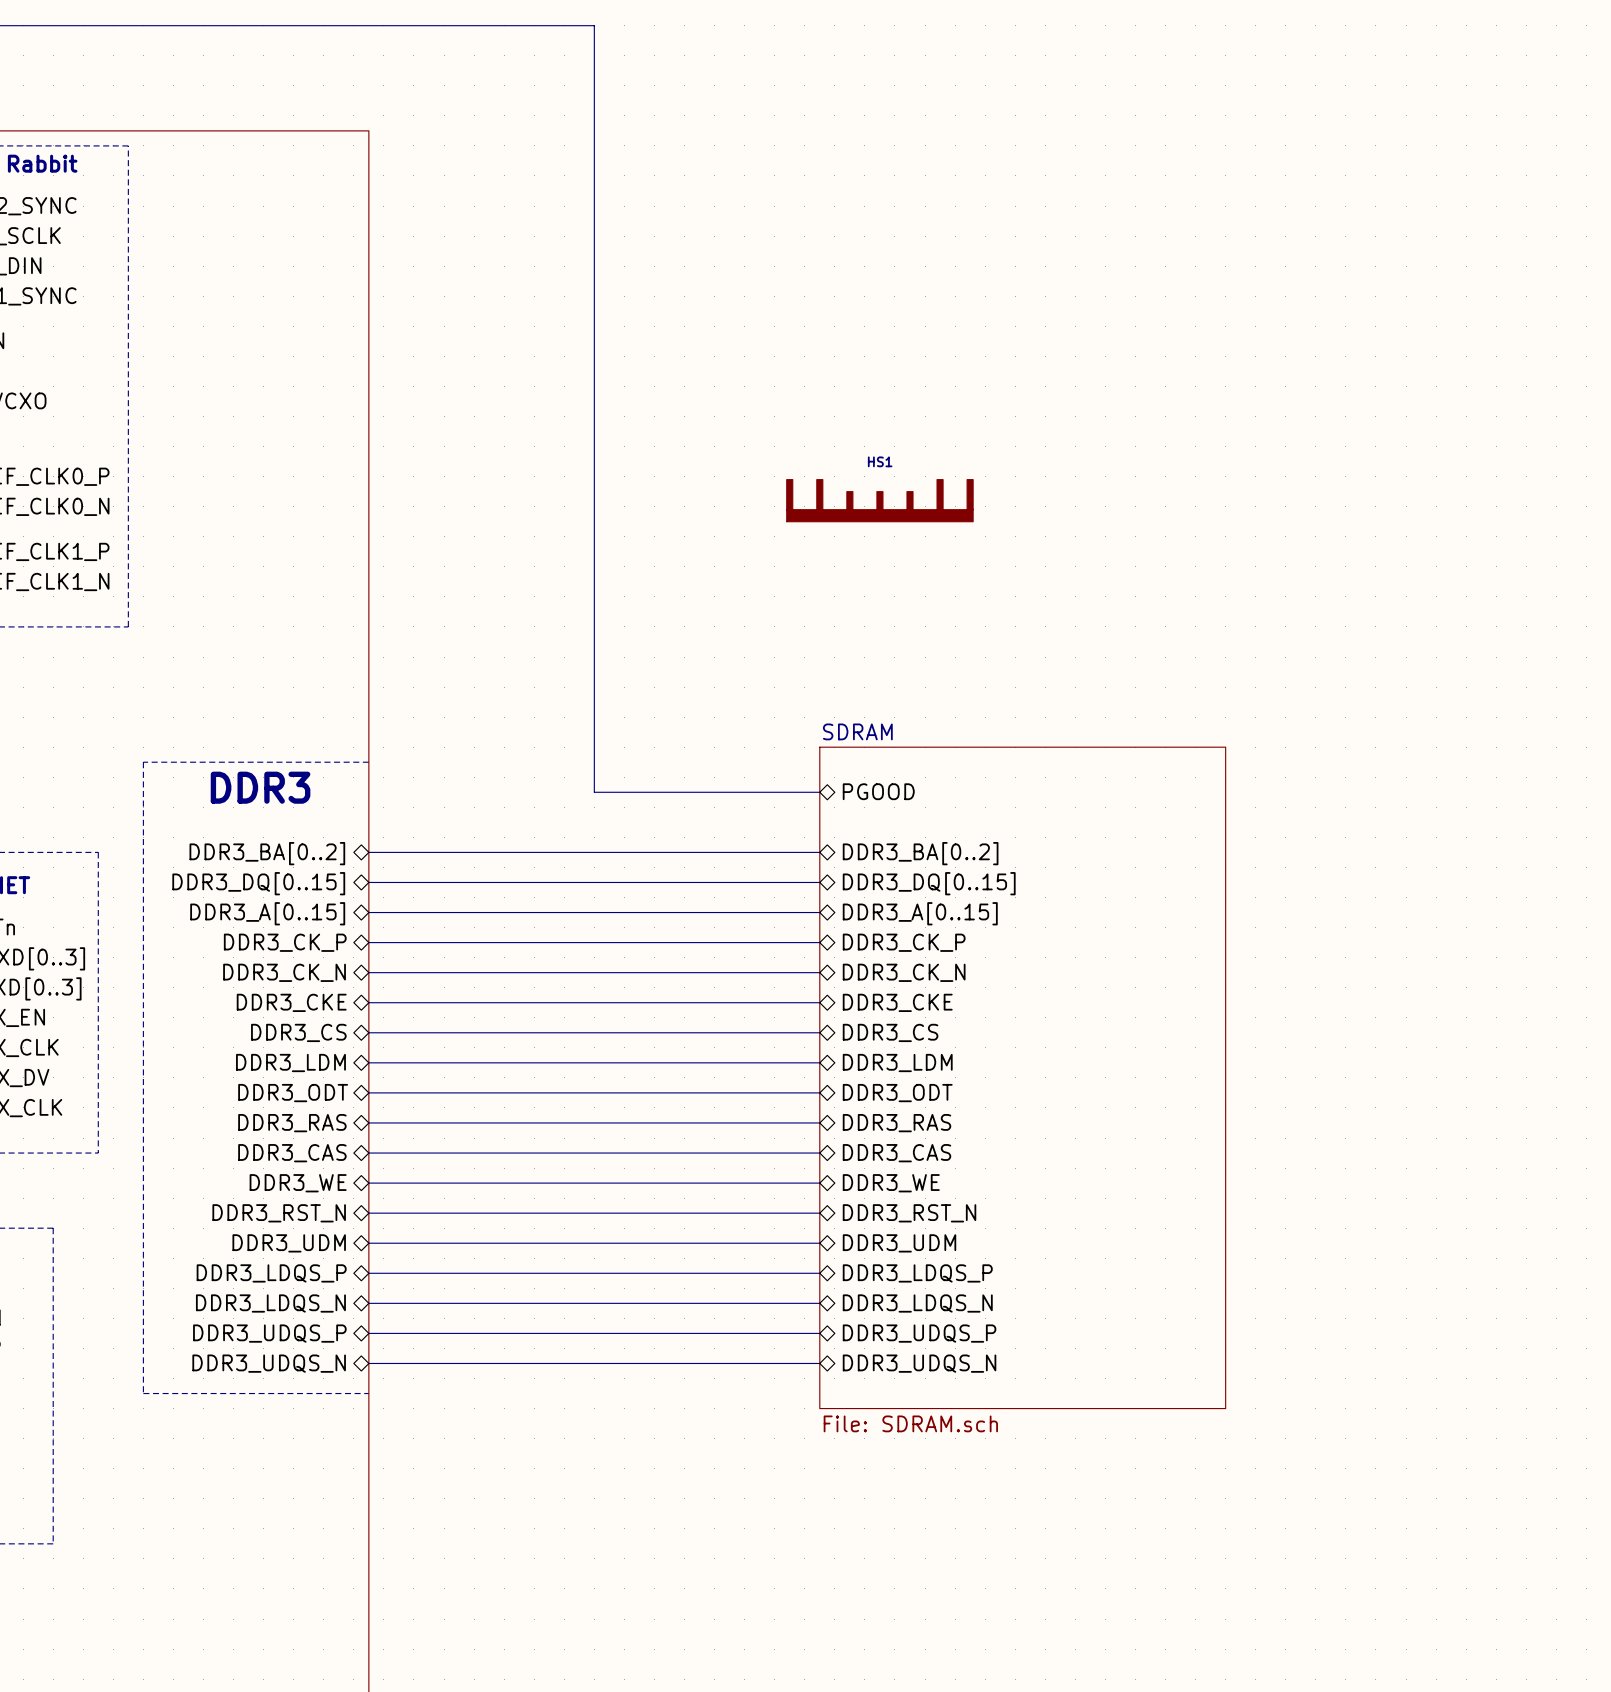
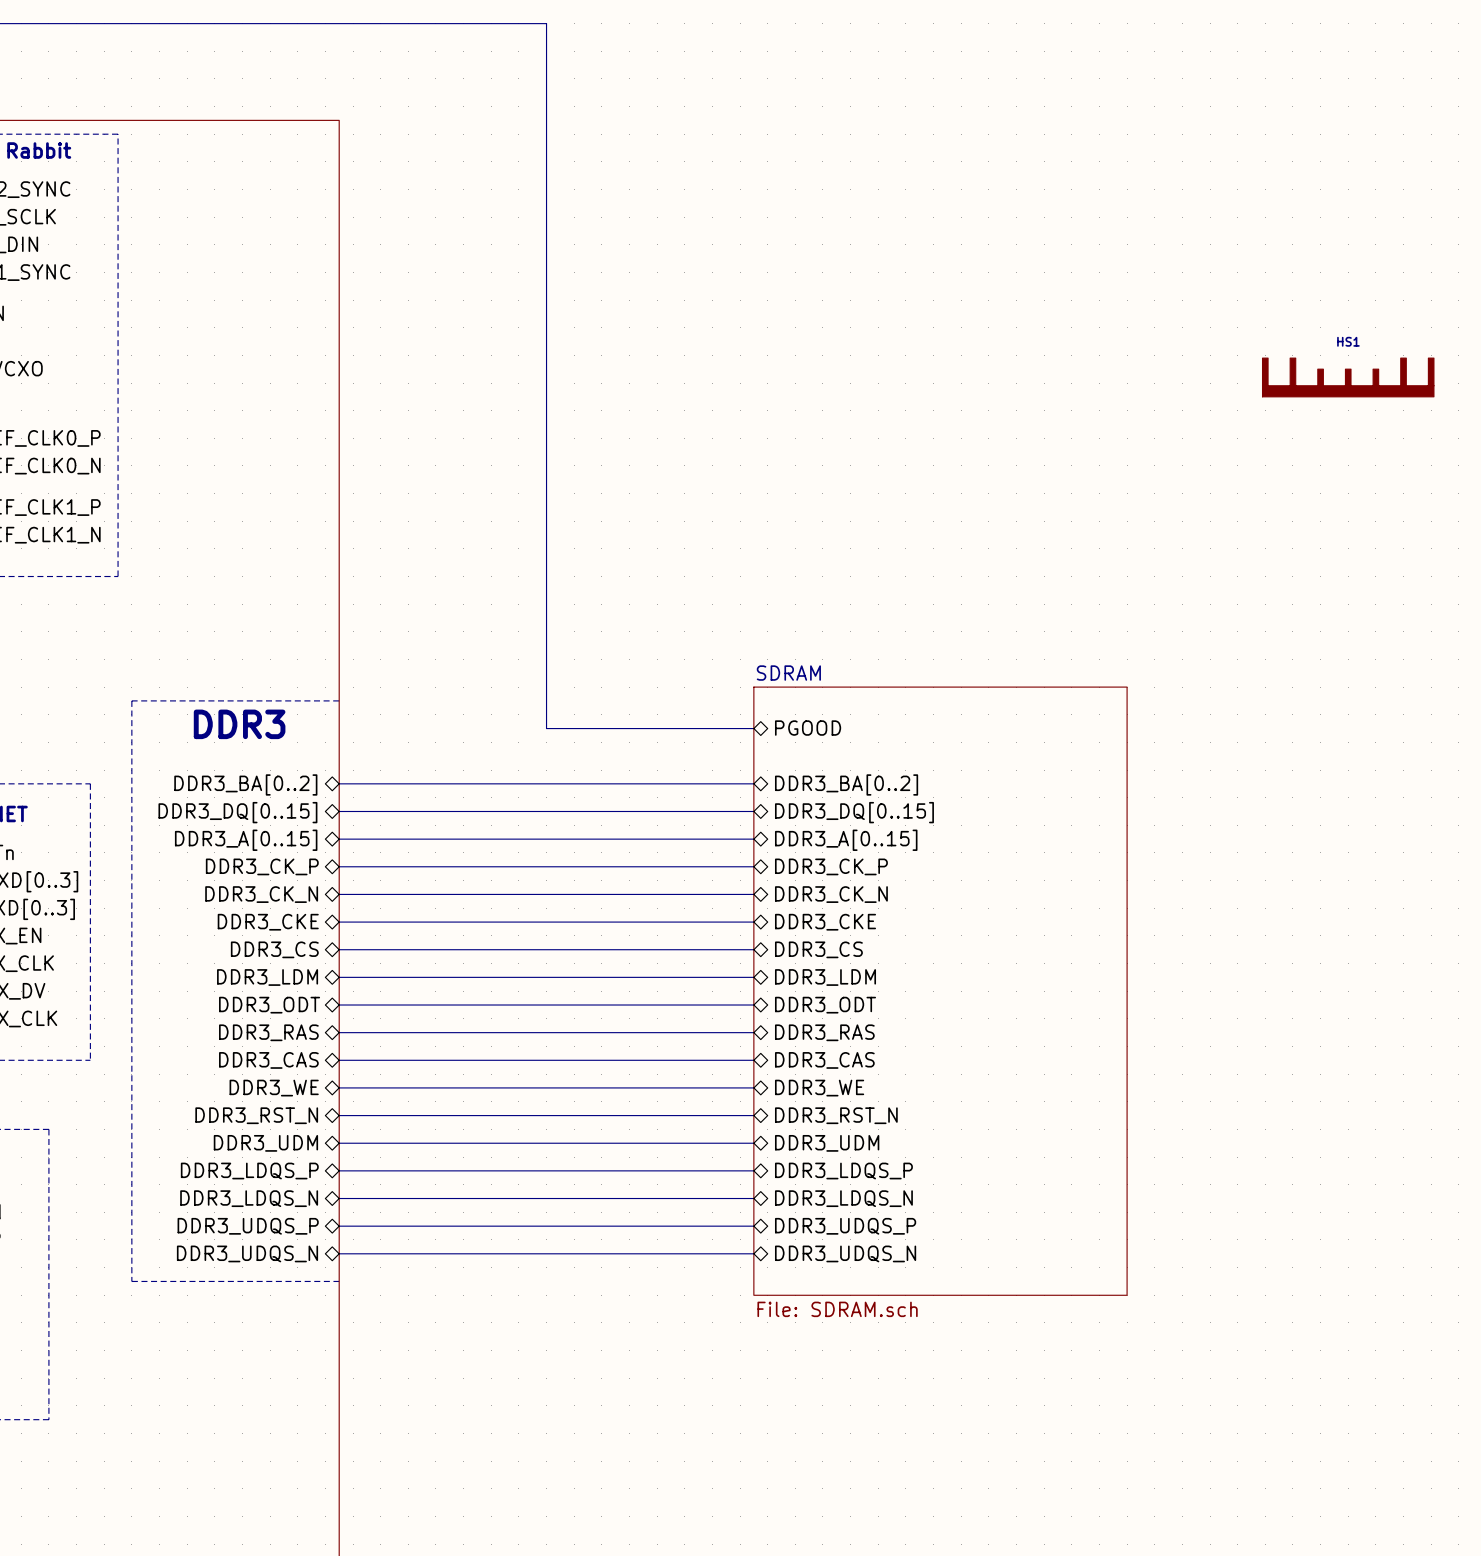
HS1 position: (879, 500) -> (1348, 377)

